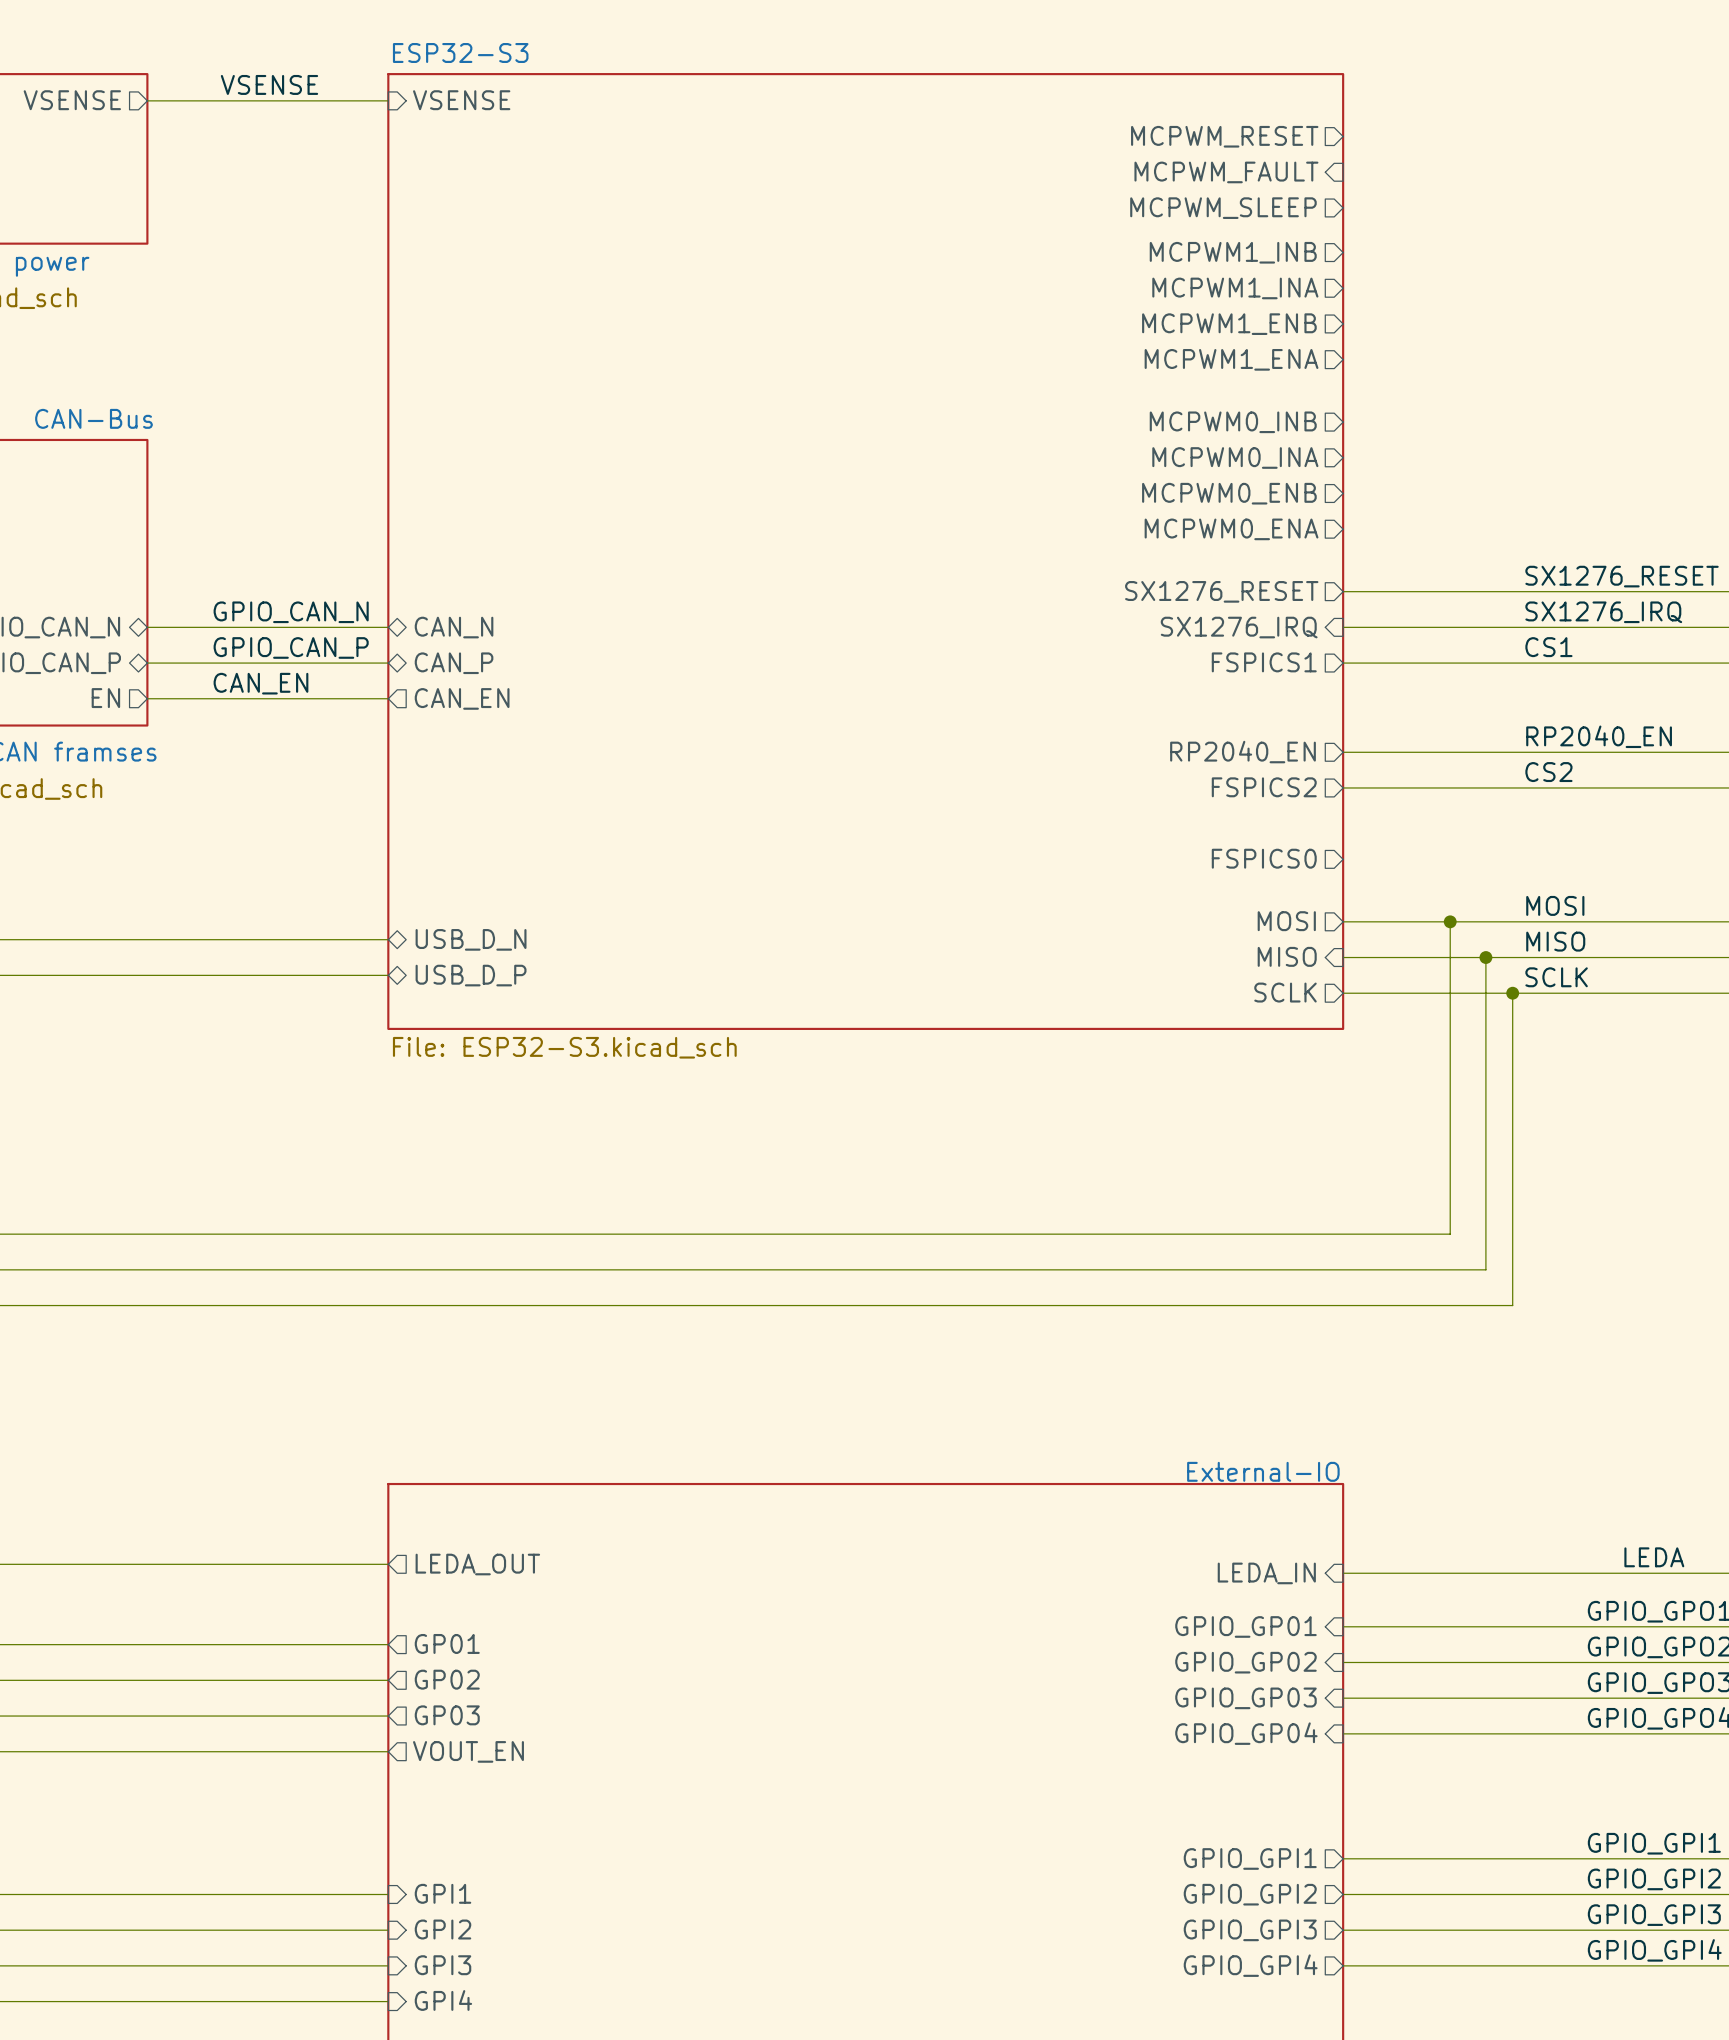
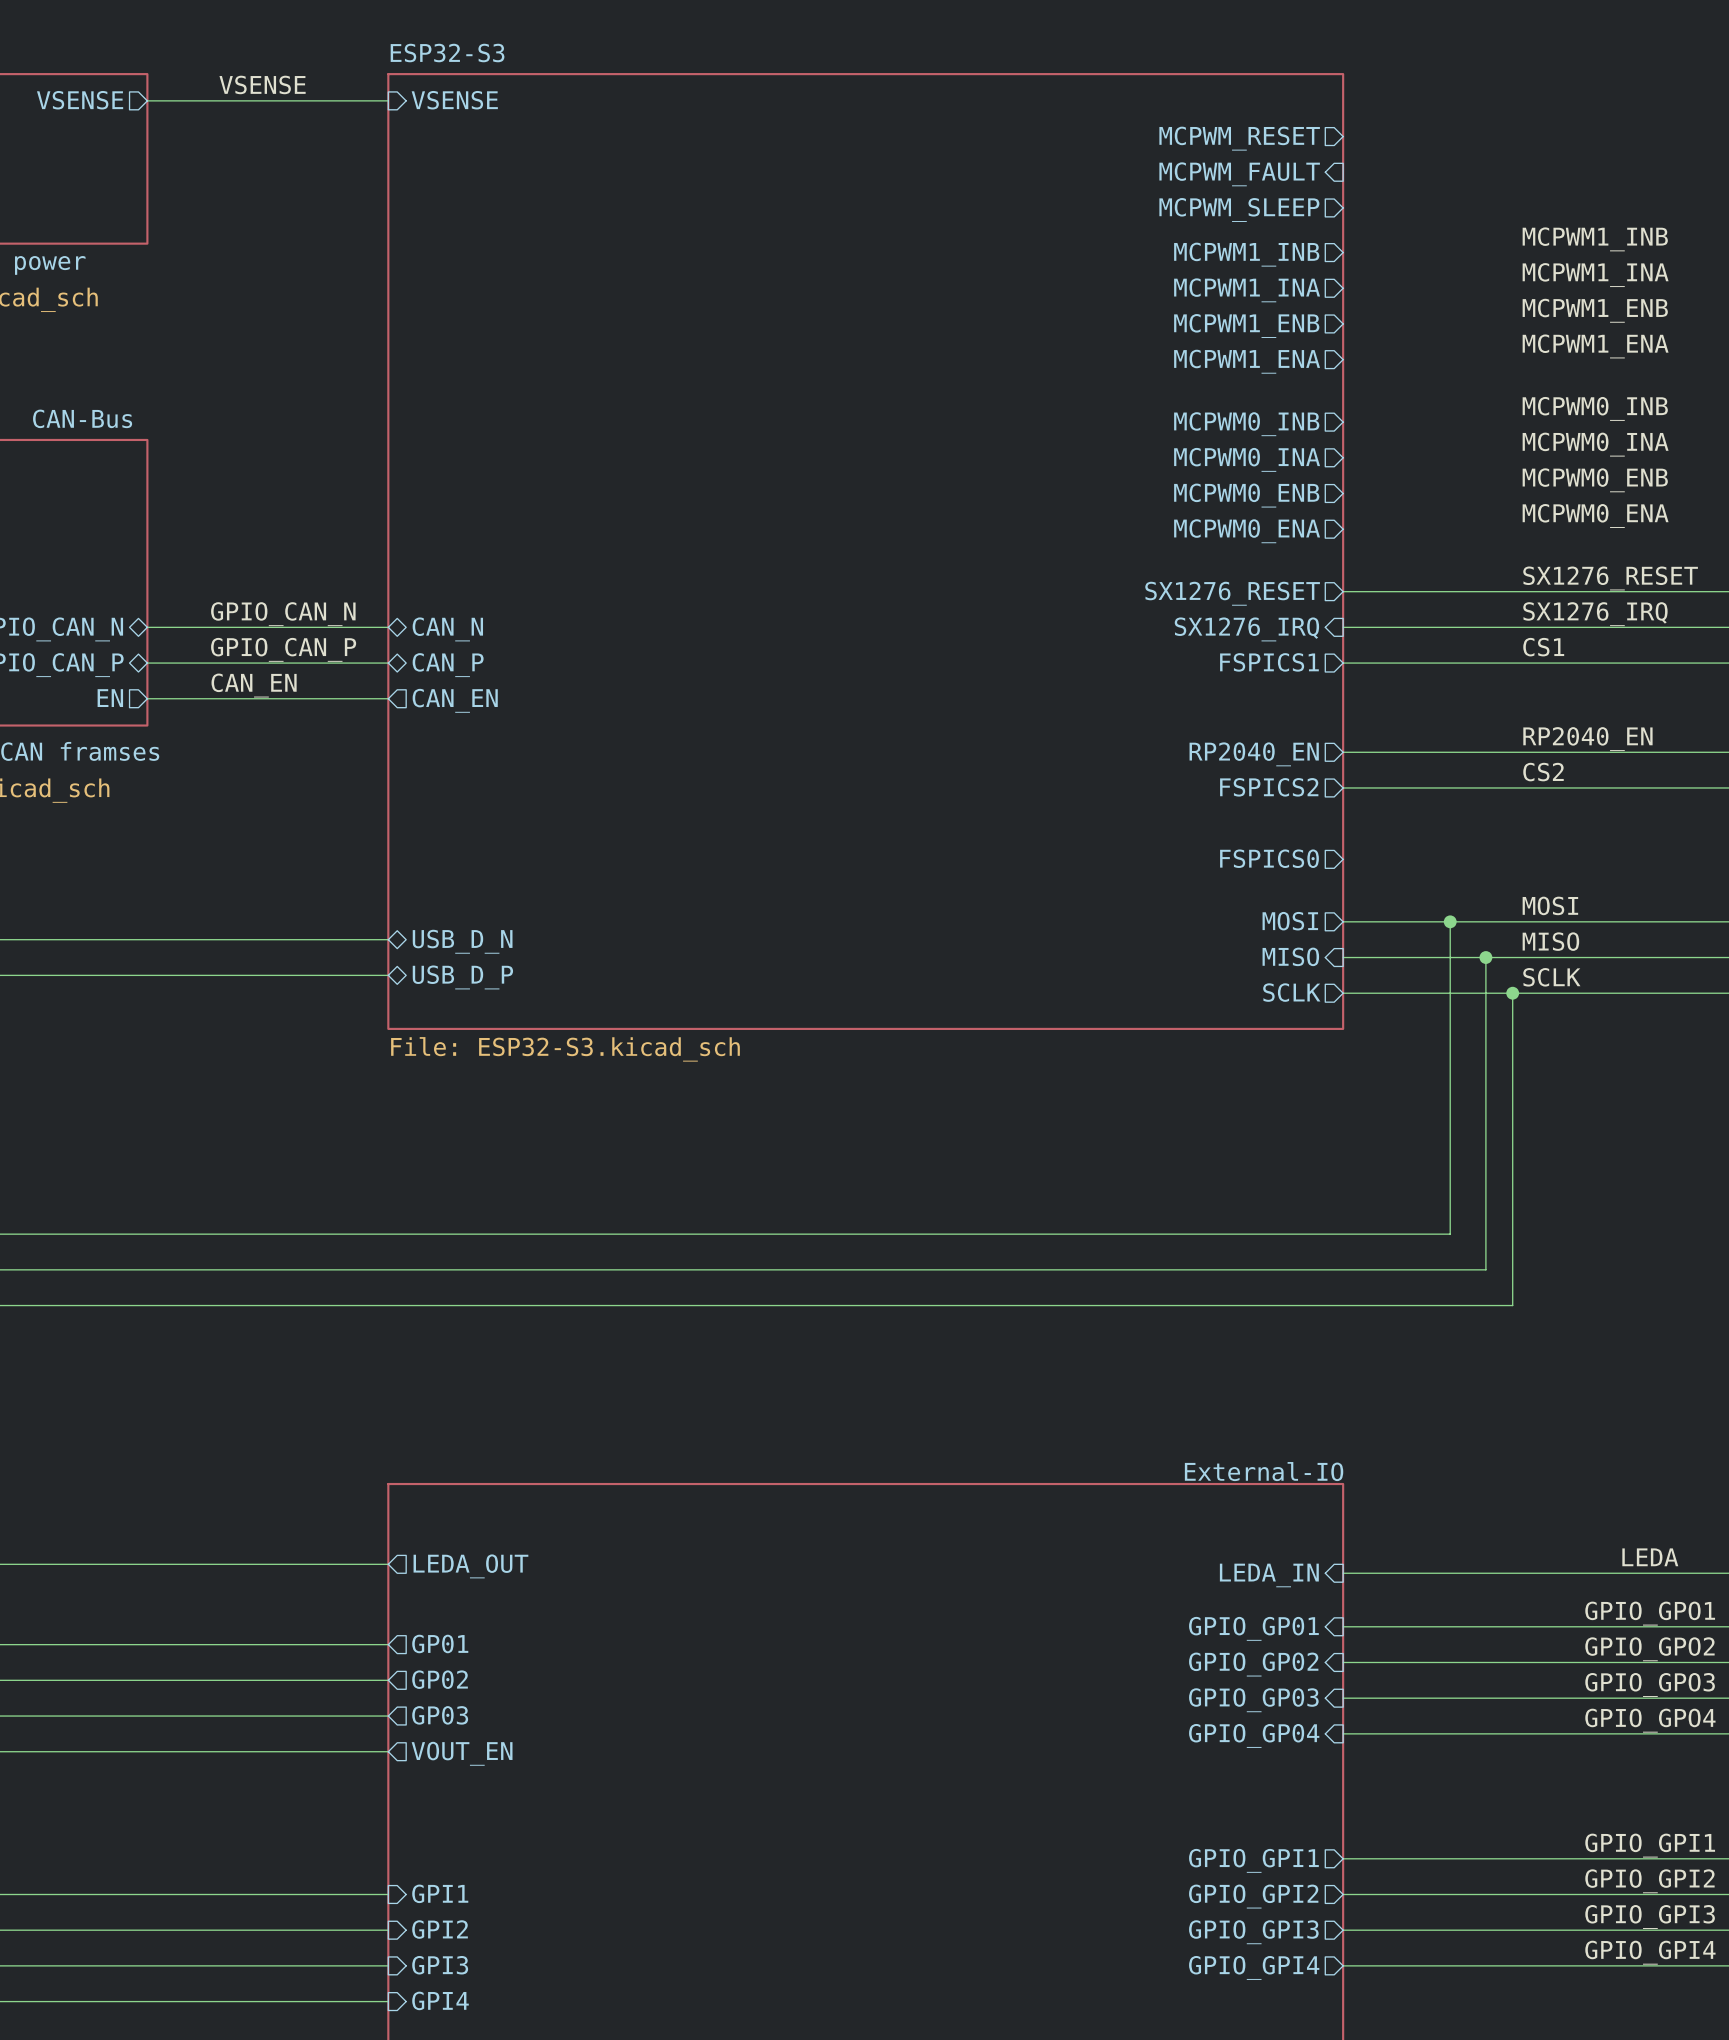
label: none -> MCPWM1_INB (1595, 239)
label: none -> MCPWM1_INA (1595, 275)
label: none -> MCPWM1_ENB (1595, 310)
label: none -> MCPWM1_ENA (1595, 346)
label: none -> MCPWM0_INB (1595, 408)
label: none -> MCPWM0_INA (1595, 444)
label: none -> MCPWM0_ENB (1595, 480)
label: none -> MCPWM0_ENA (1595, 516)

